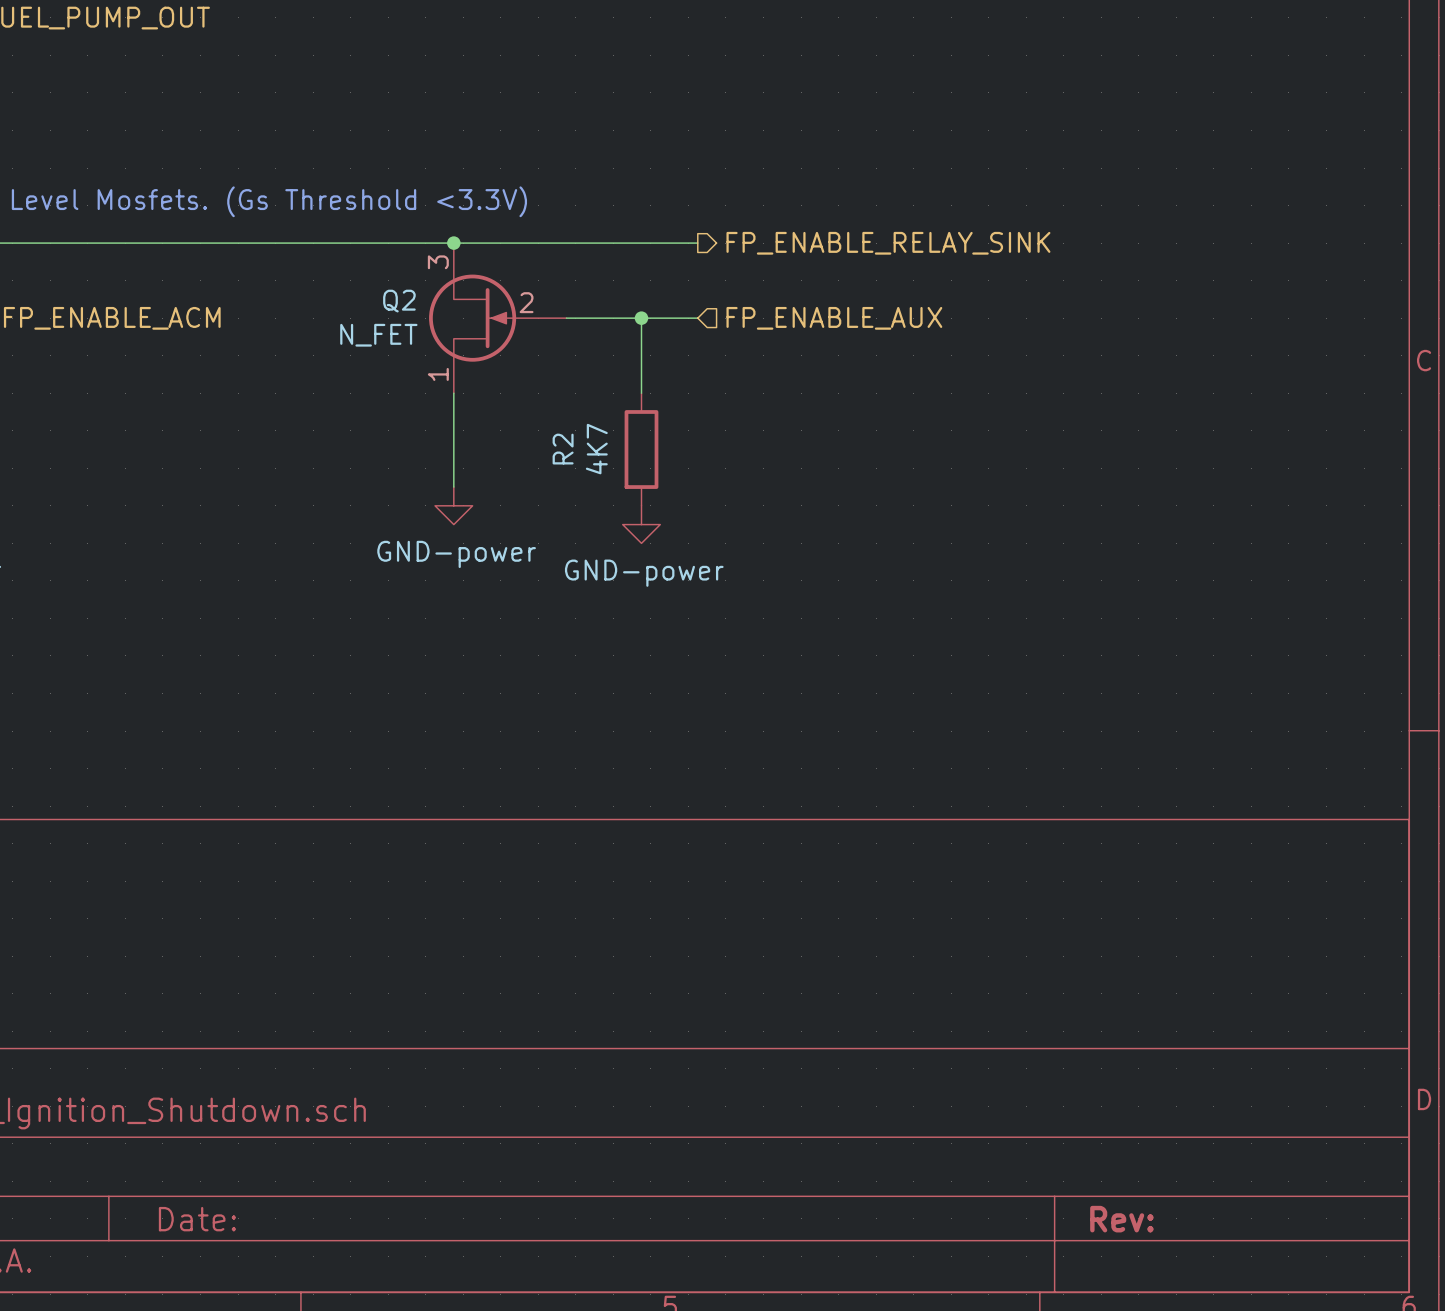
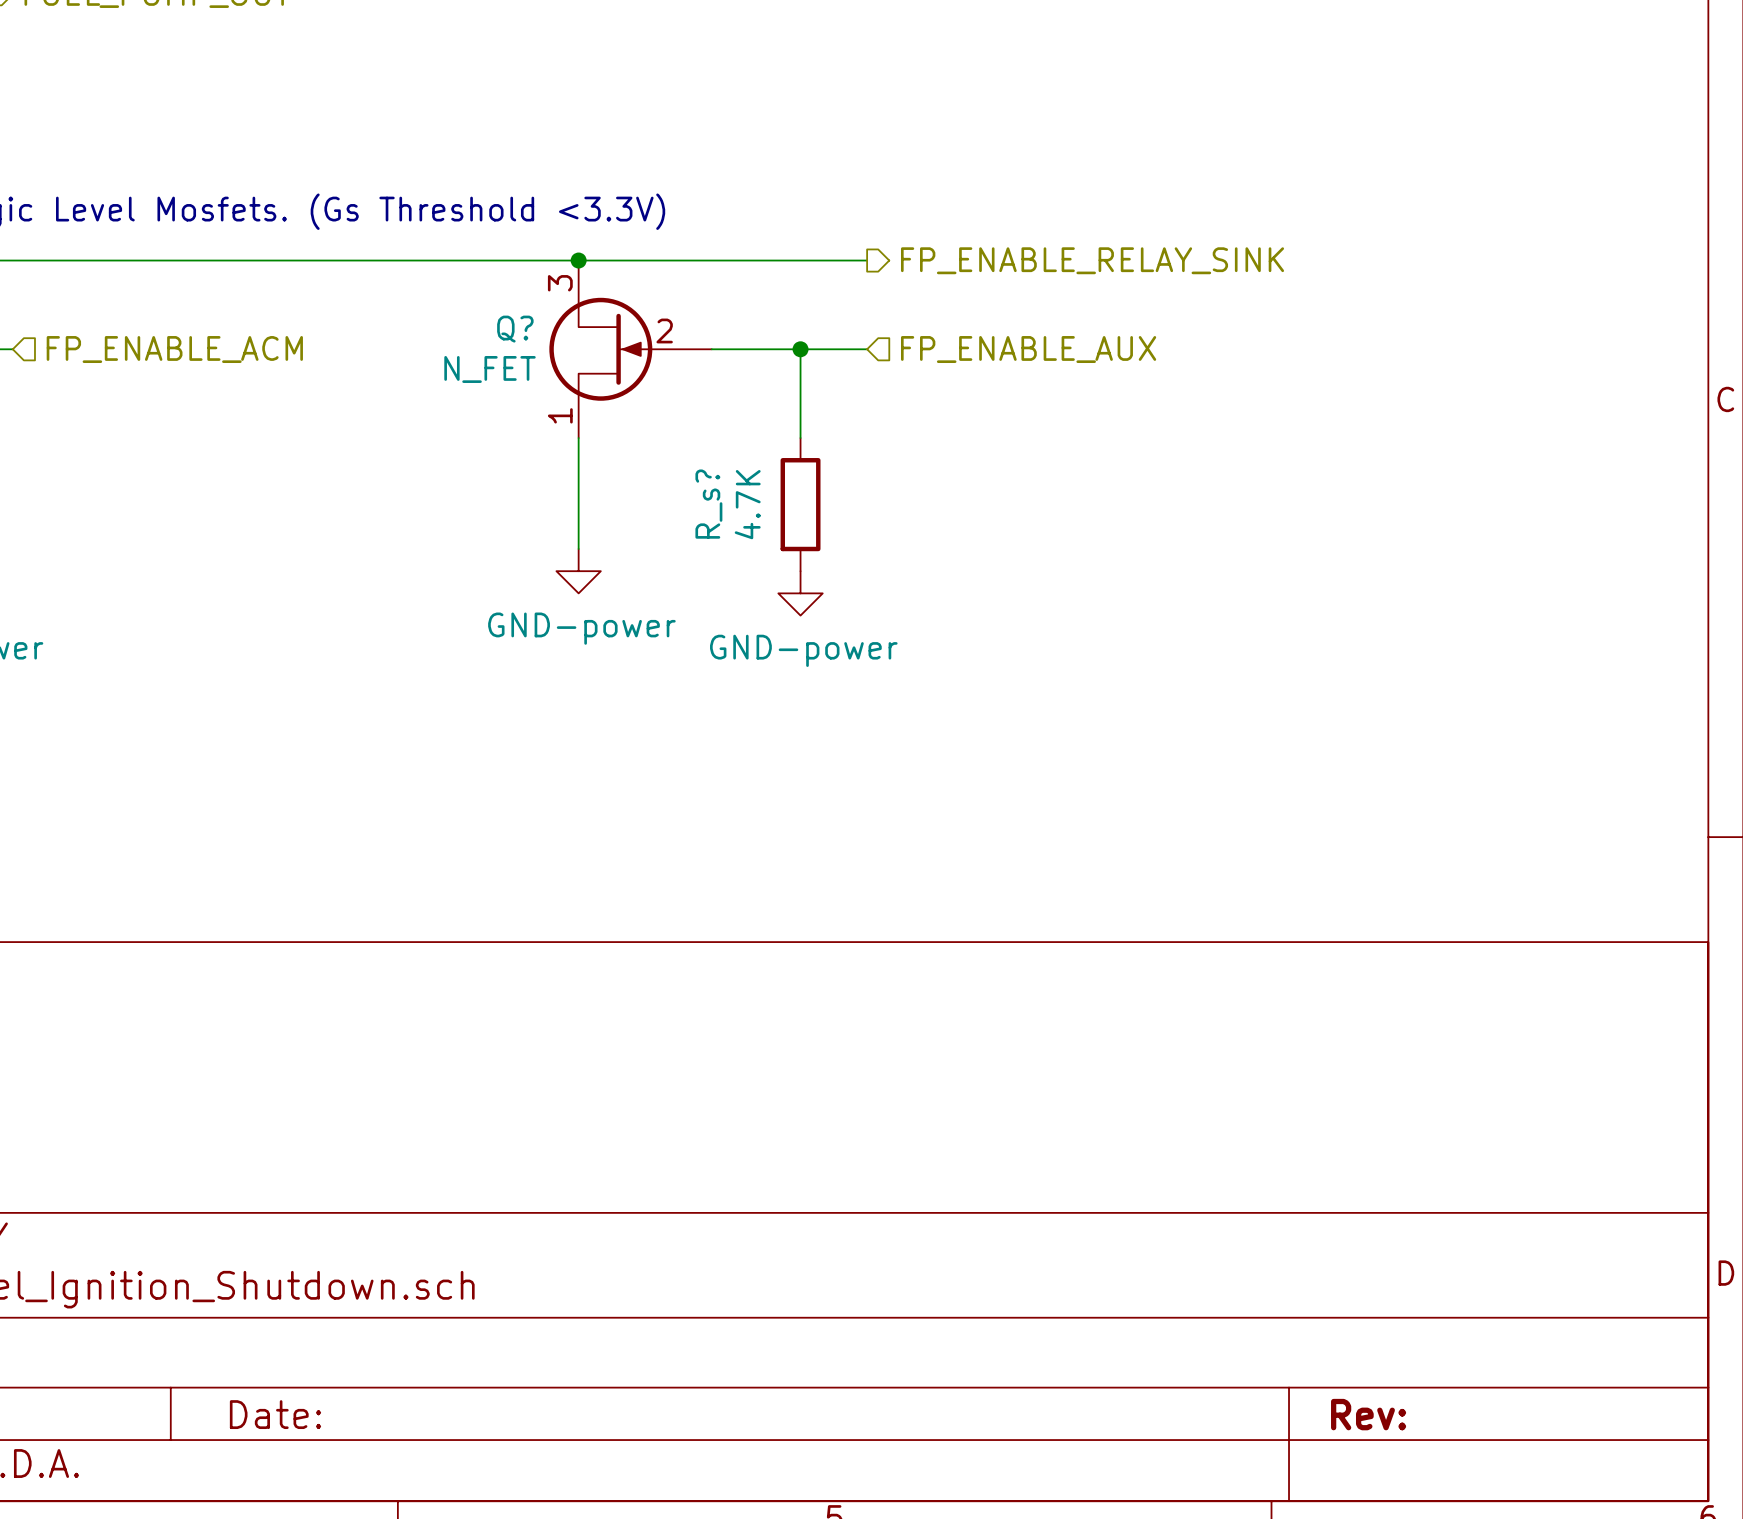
Q2 name: Q2 (399, 301) -> Q? (515, 329)
R2 name: R2 (563, 449) -> R_s? (708, 504)
R2 value: 4K7 (596, 449) -> 4.7K (747, 504)

